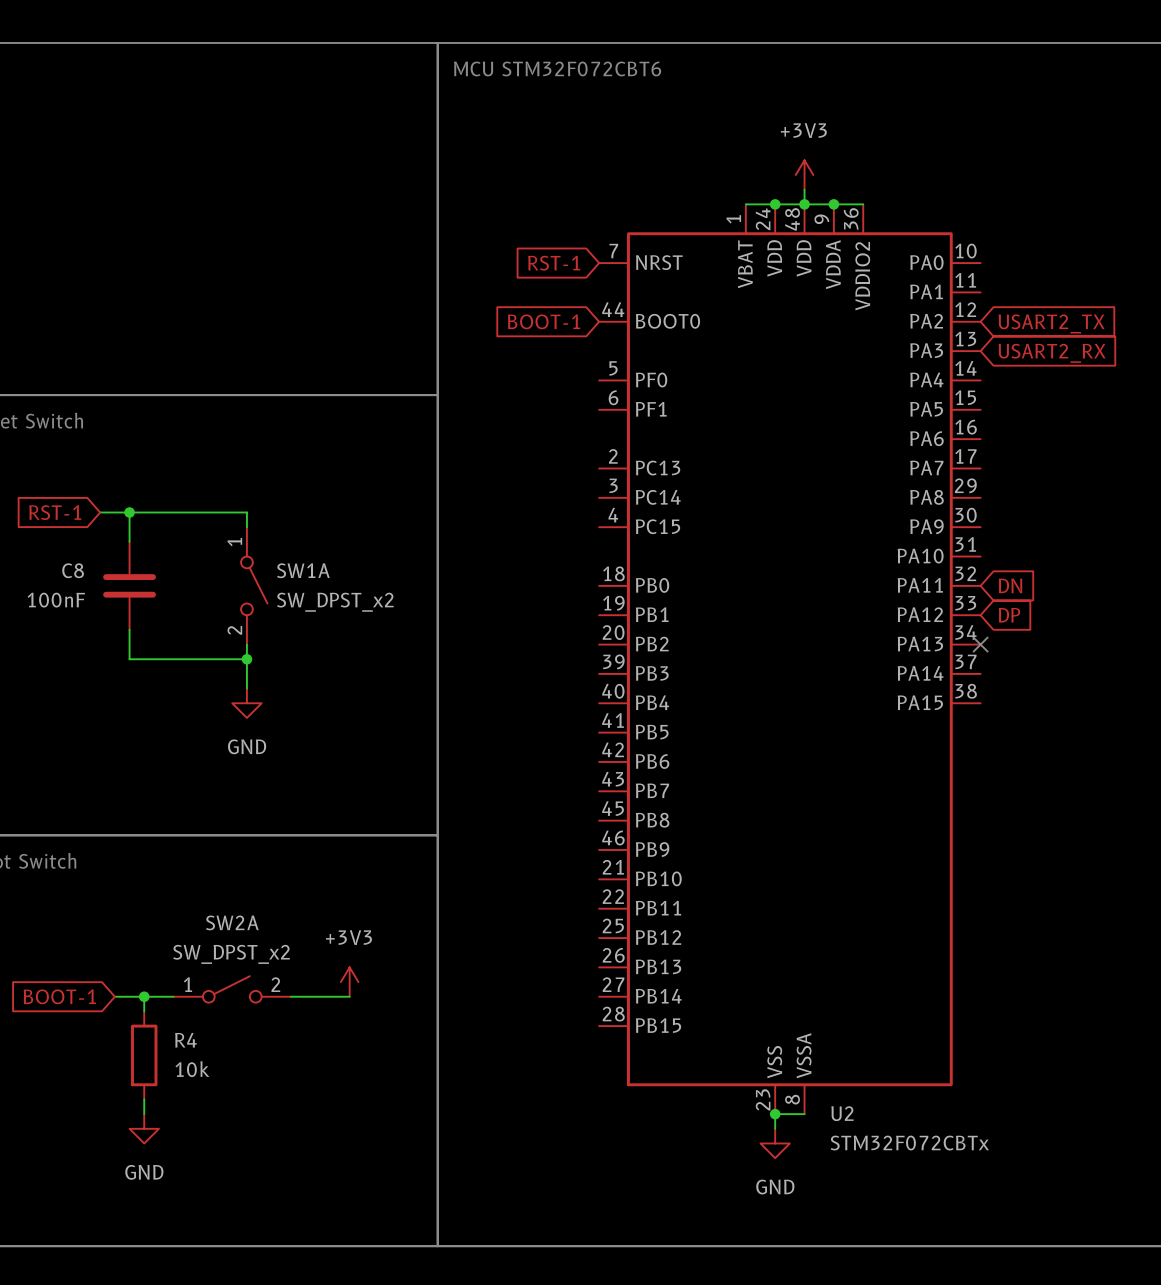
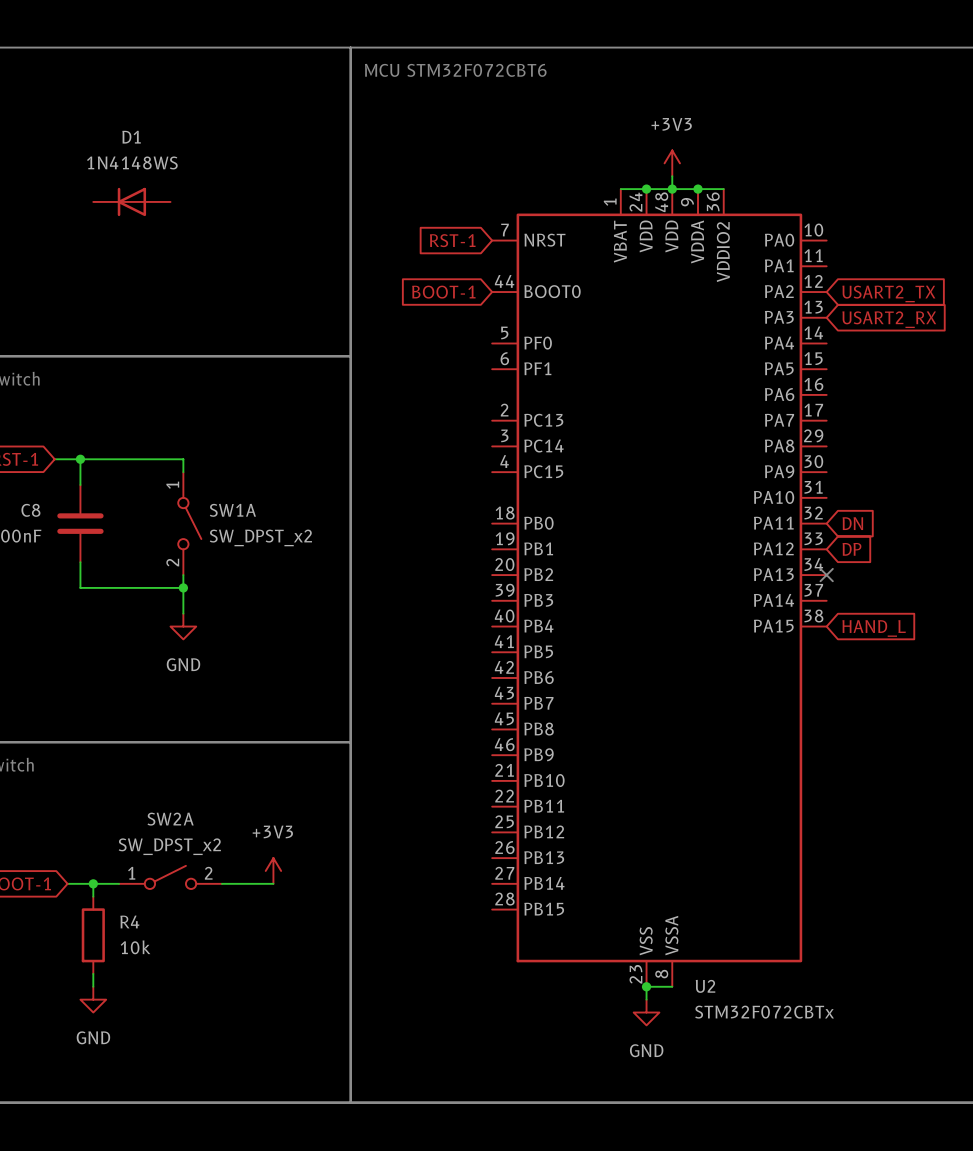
D1: none -> 1N4148WS (131, 201)
global label: none -> HAND_L (874, 628)

